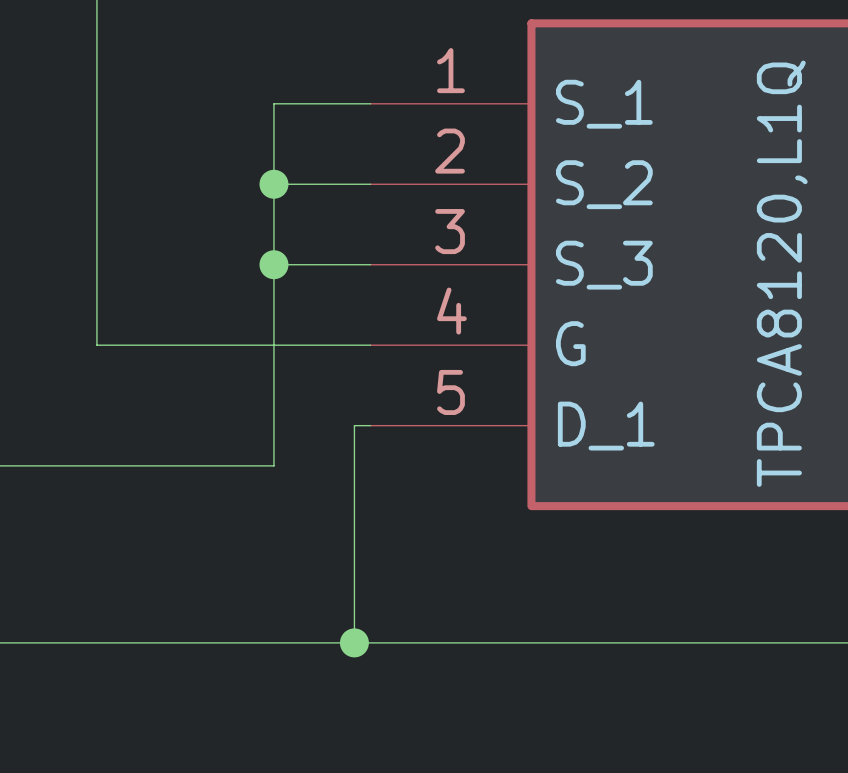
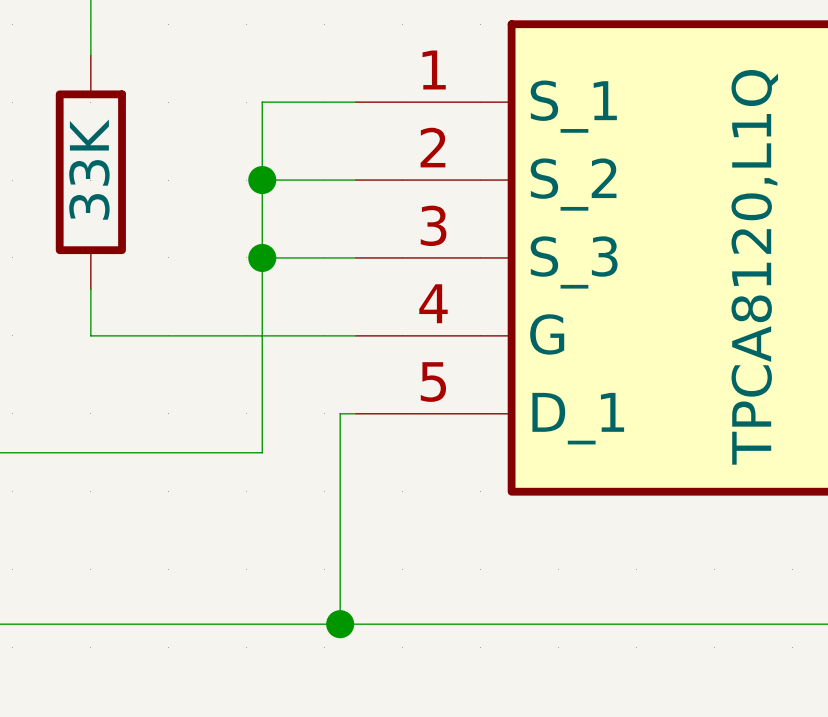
wire: (96, 55) (96, 296) -> none
part: none -> 33K (90, 172)

